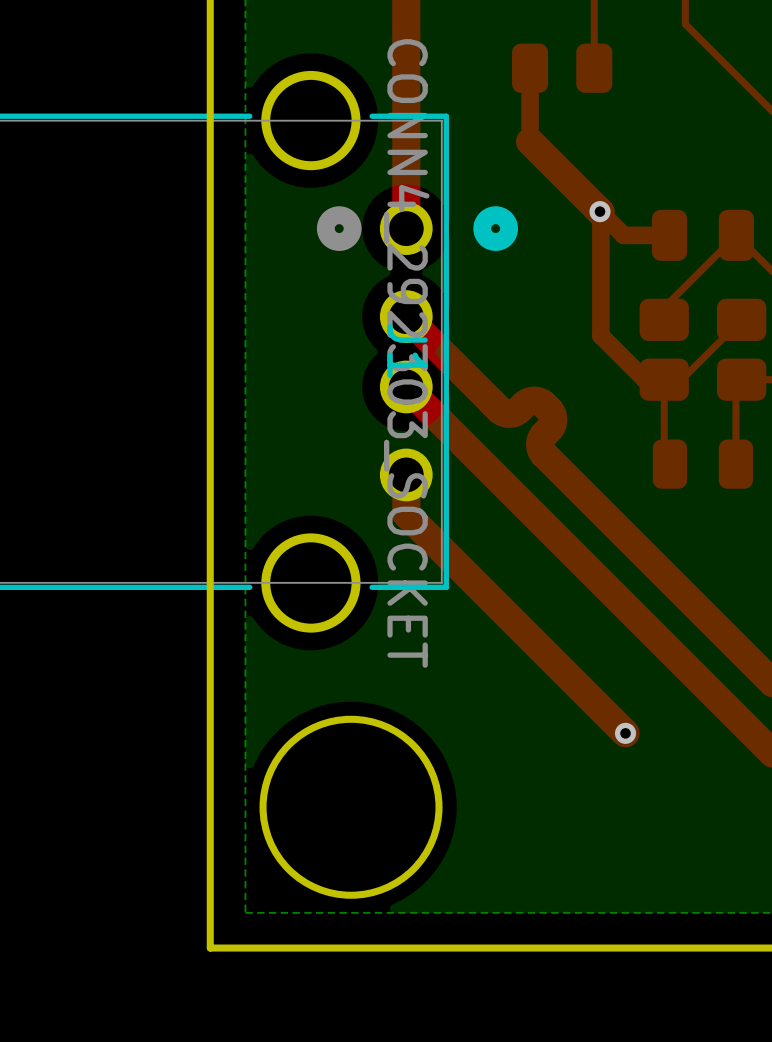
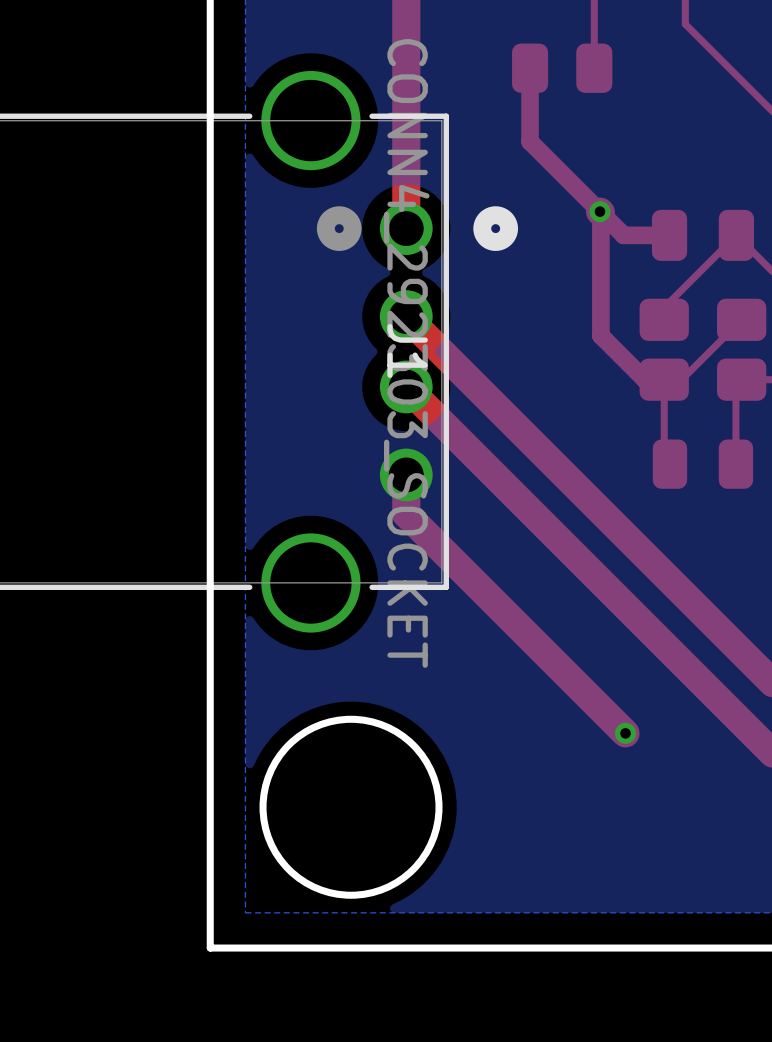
top track width: thick (530, 141) (600, 211) -> thin (530, 141) (600, 211)
top track: (499, 409) (504, 413) (512, 413) (526, 402) (534, 400) (541, 402) (549, 409) (552, 416) (552, 423) (540, 442) (544, 454) -> (499, 409) (544, 454)

